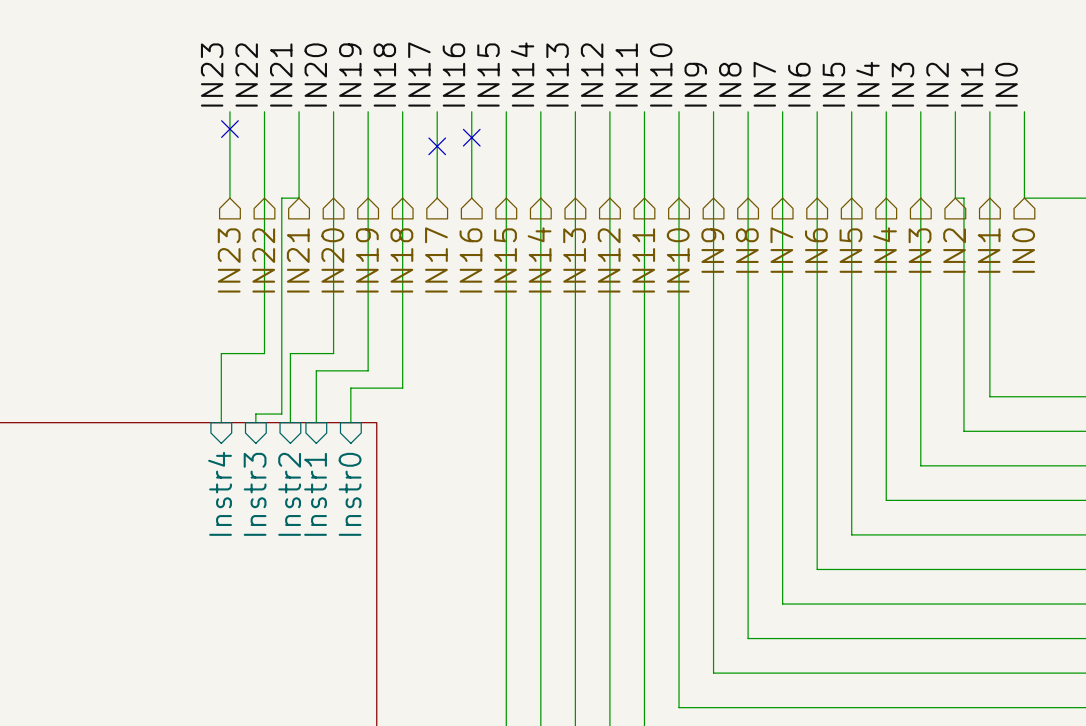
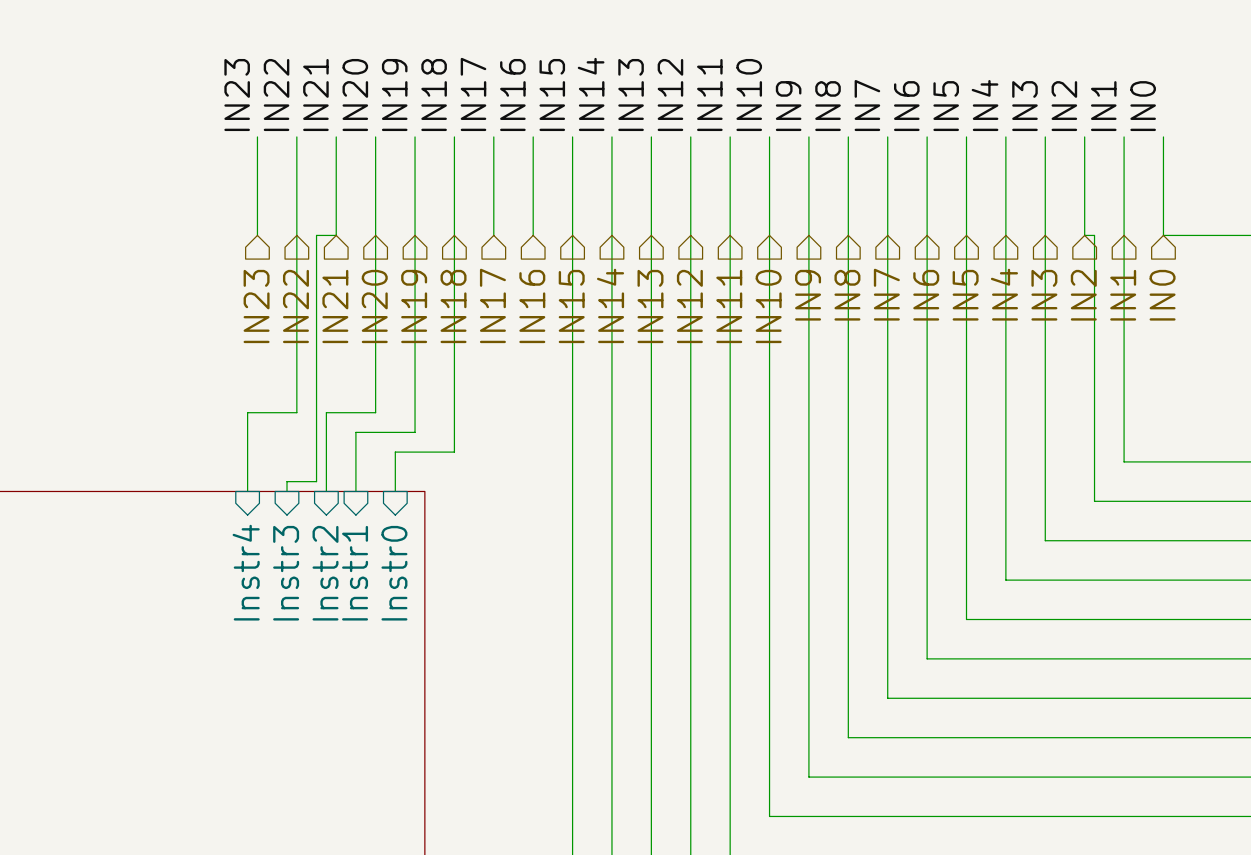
no-connect mark: (229, 129) -> none
no-connect mark: (471, 137) -> none
no-connect mark: (437, 146) -> none

